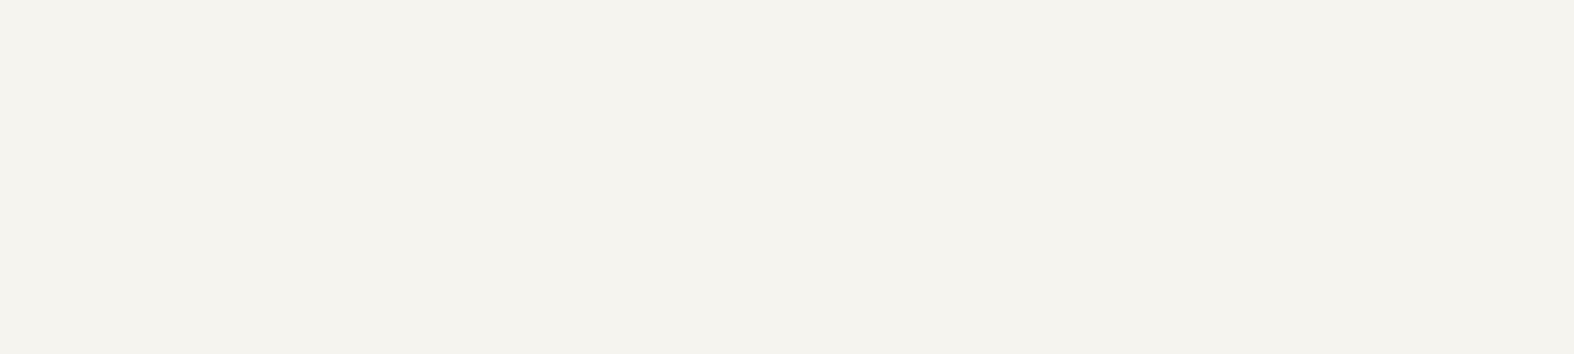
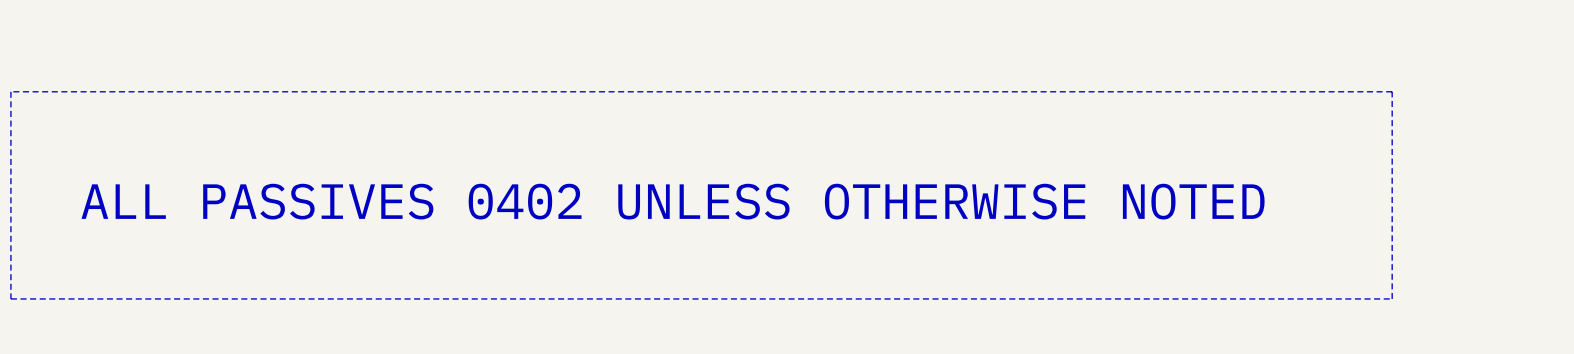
line: none -> (10, 91) (10, 298) (1392, 298) (1392, 91) (10, 91)
text: none -> ALL PASSIVES 0402 UNLESS OTHERWISE NOTED (673, 201)

